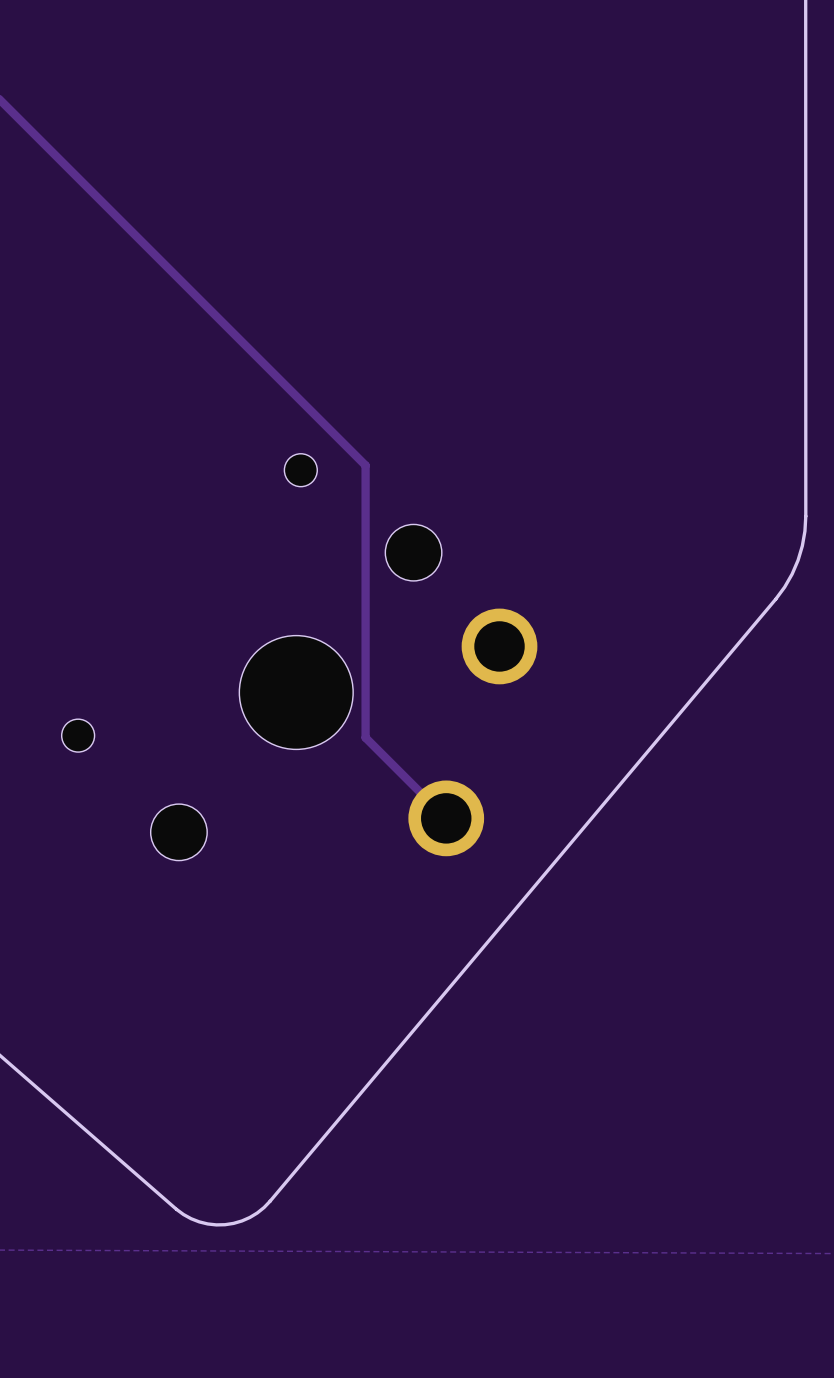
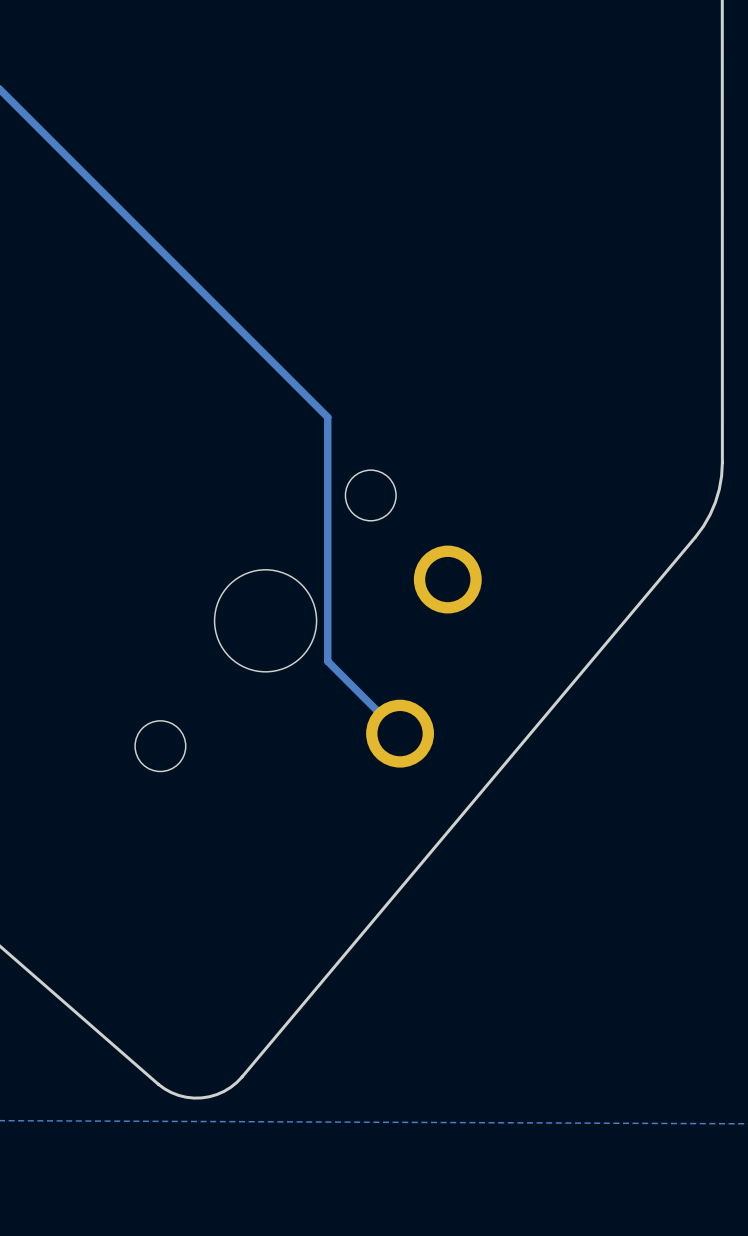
part: (299, 657) -> none

